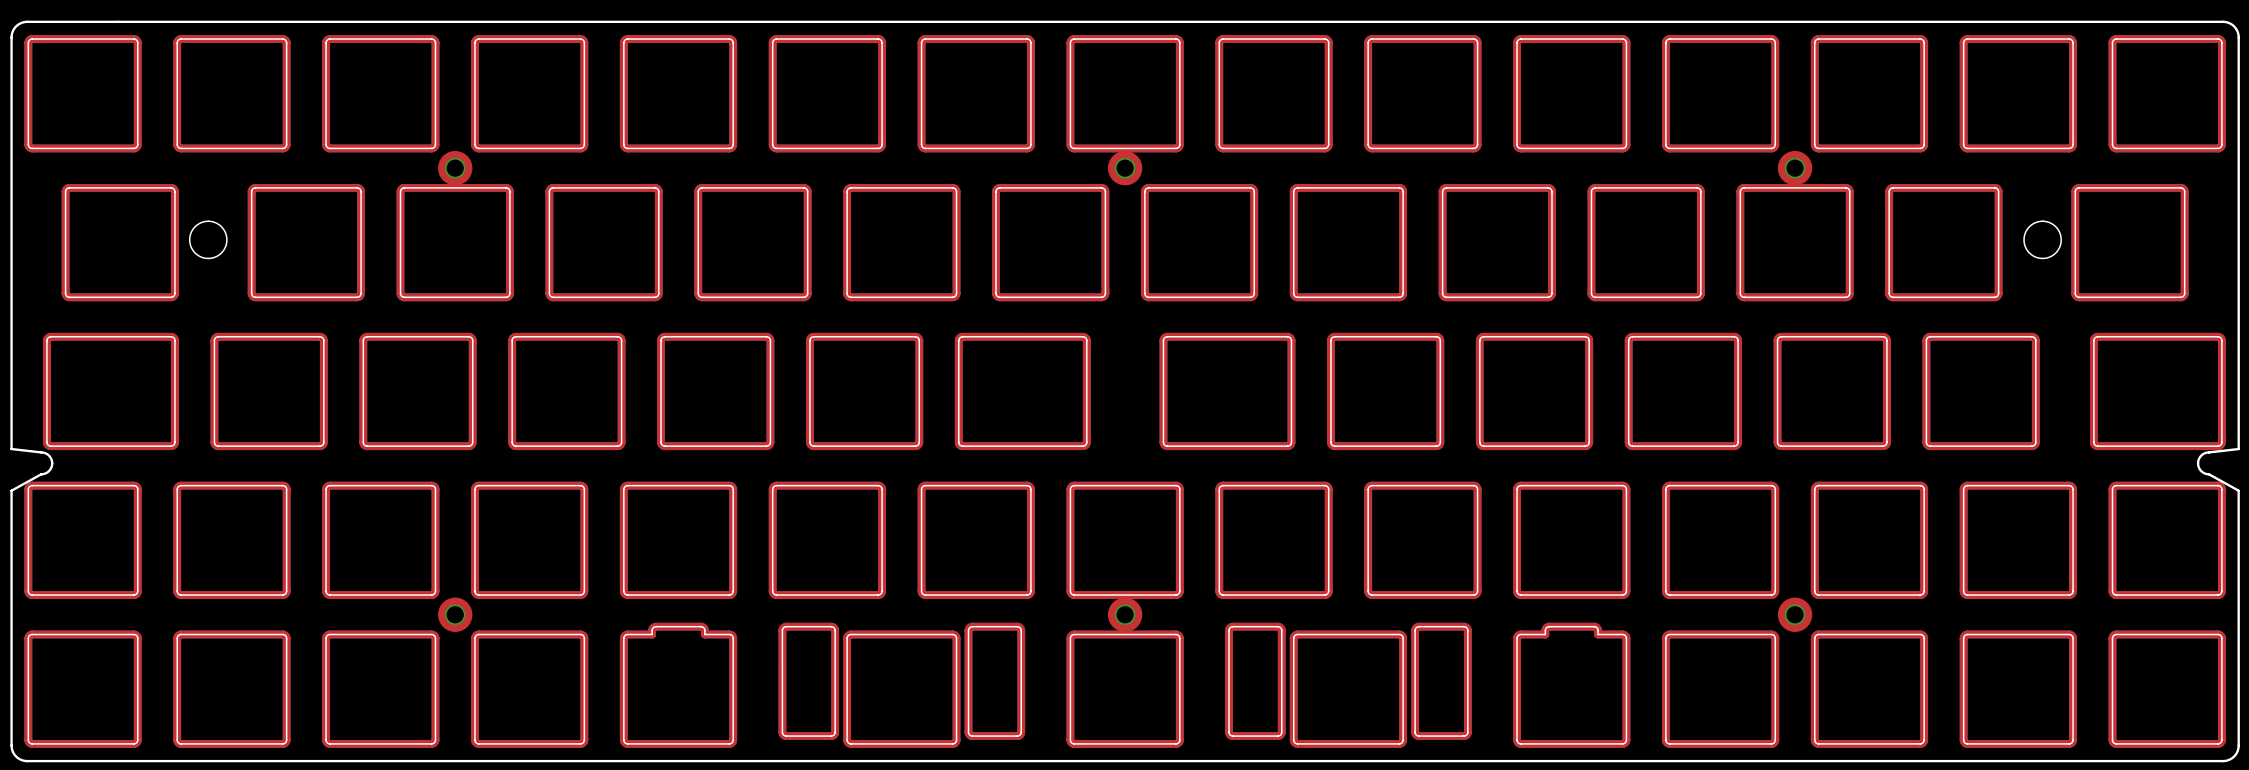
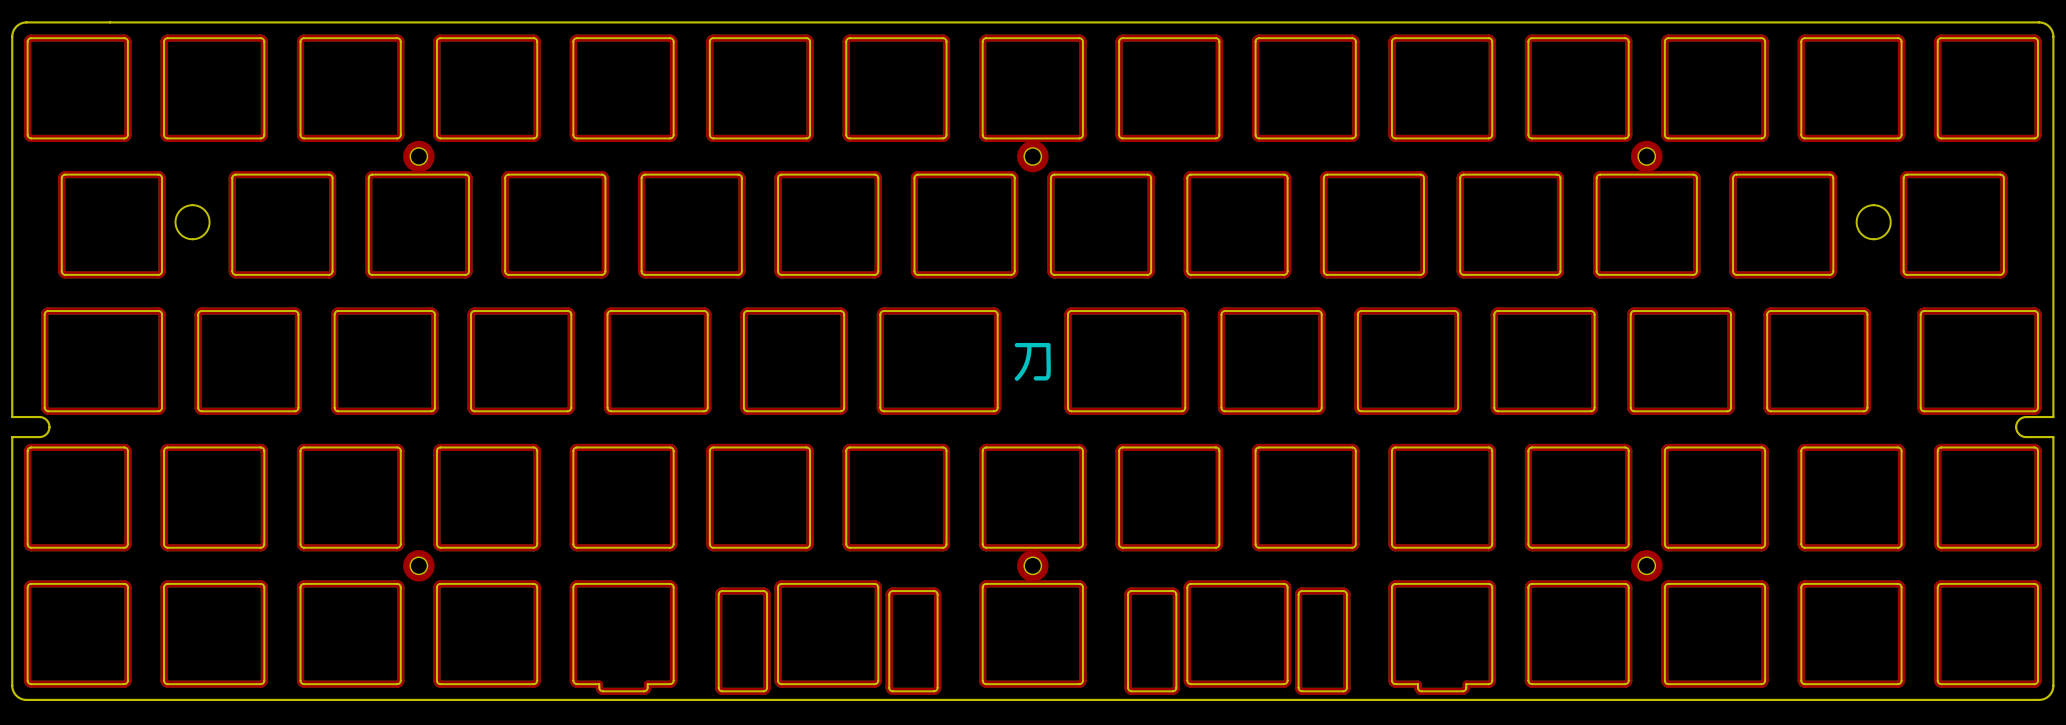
drawing shape: [10, 20, 2240, 763] -> [11, 21, 2055, 702]
drawing: none -> [1014, 342, 1051, 381]
drawing shape: [619, 622, 1631, 748] -> [569, 580, 1496, 695]
drawing shape: [778, 622, 1026, 748] -> [715, 580, 942, 695]
drawing shape: [1225, 622, 1472, 748] -> [1124, 580, 1351, 695]

